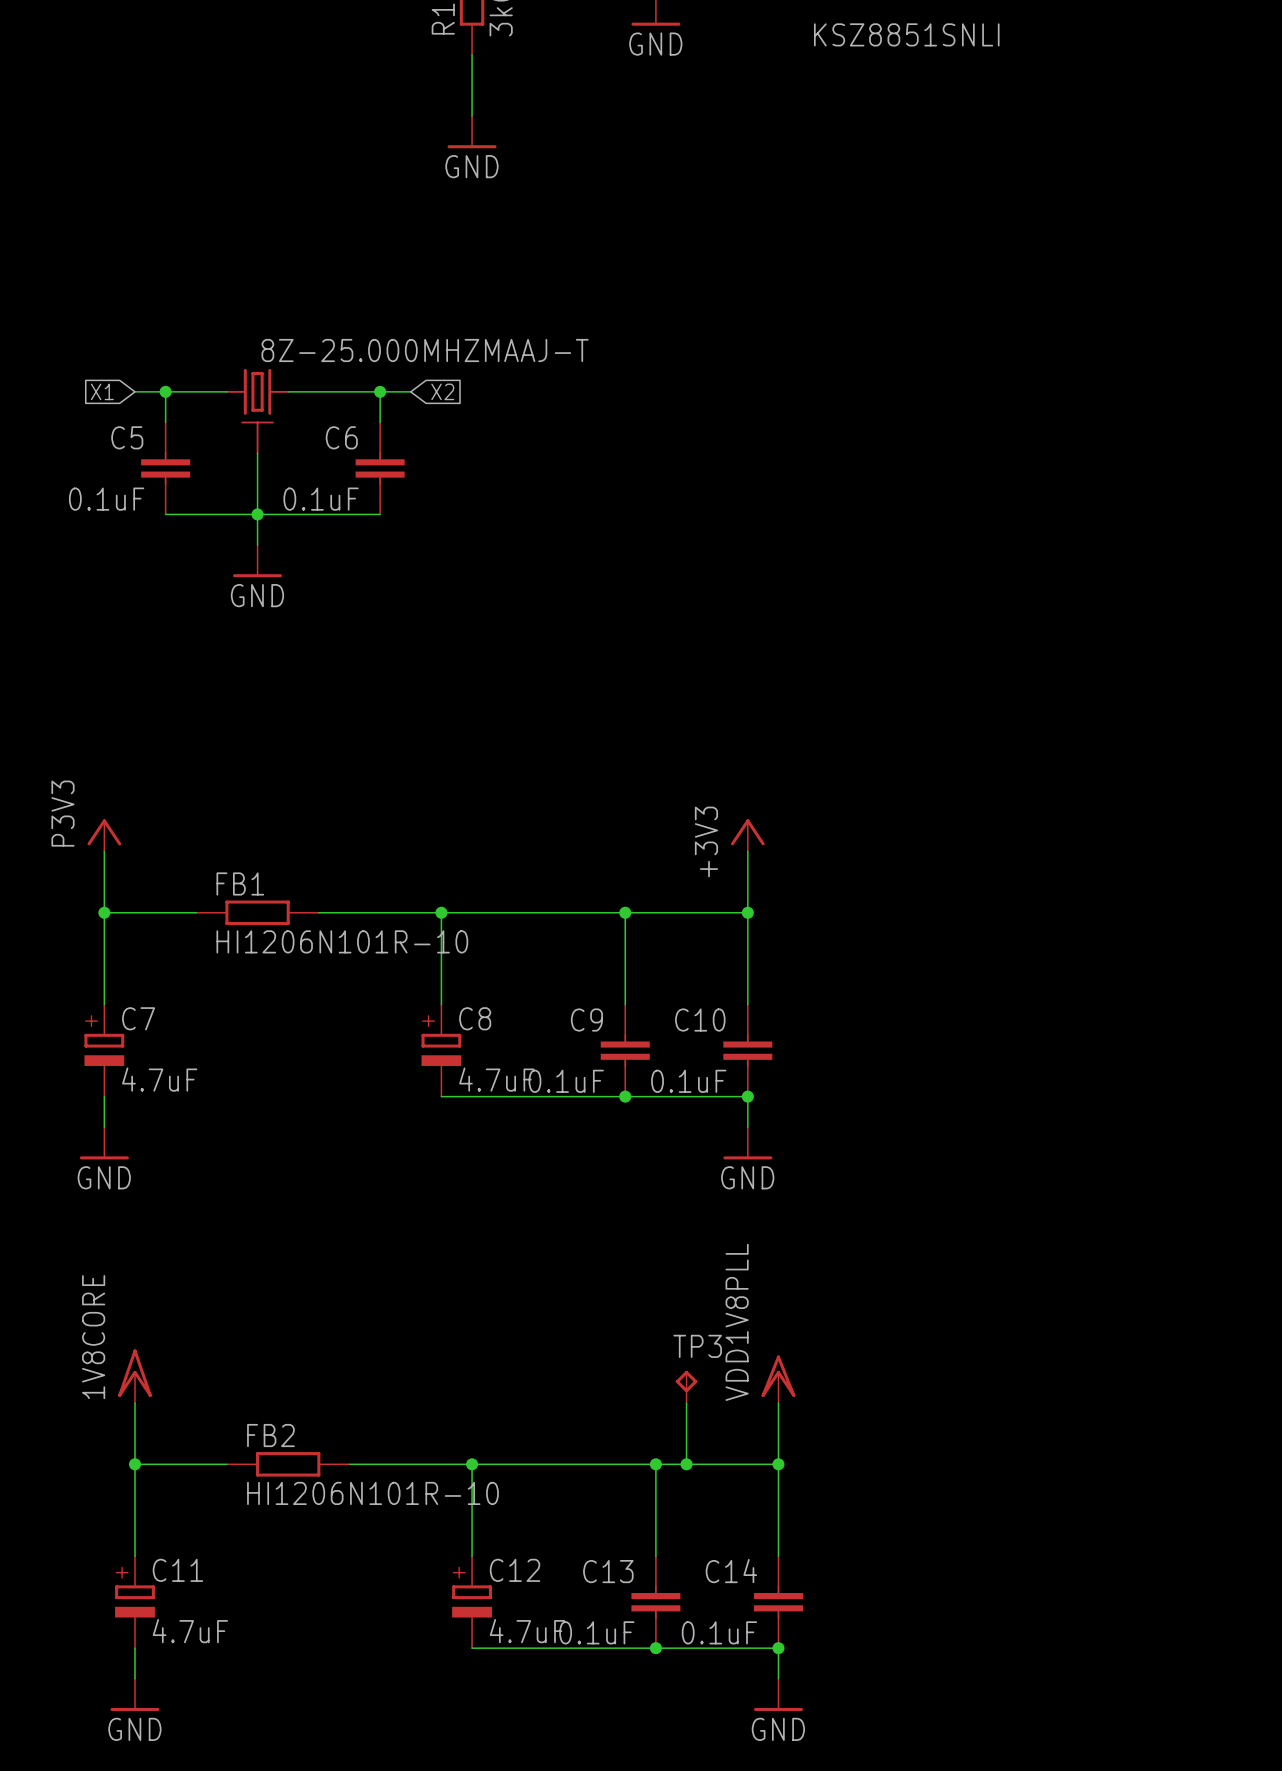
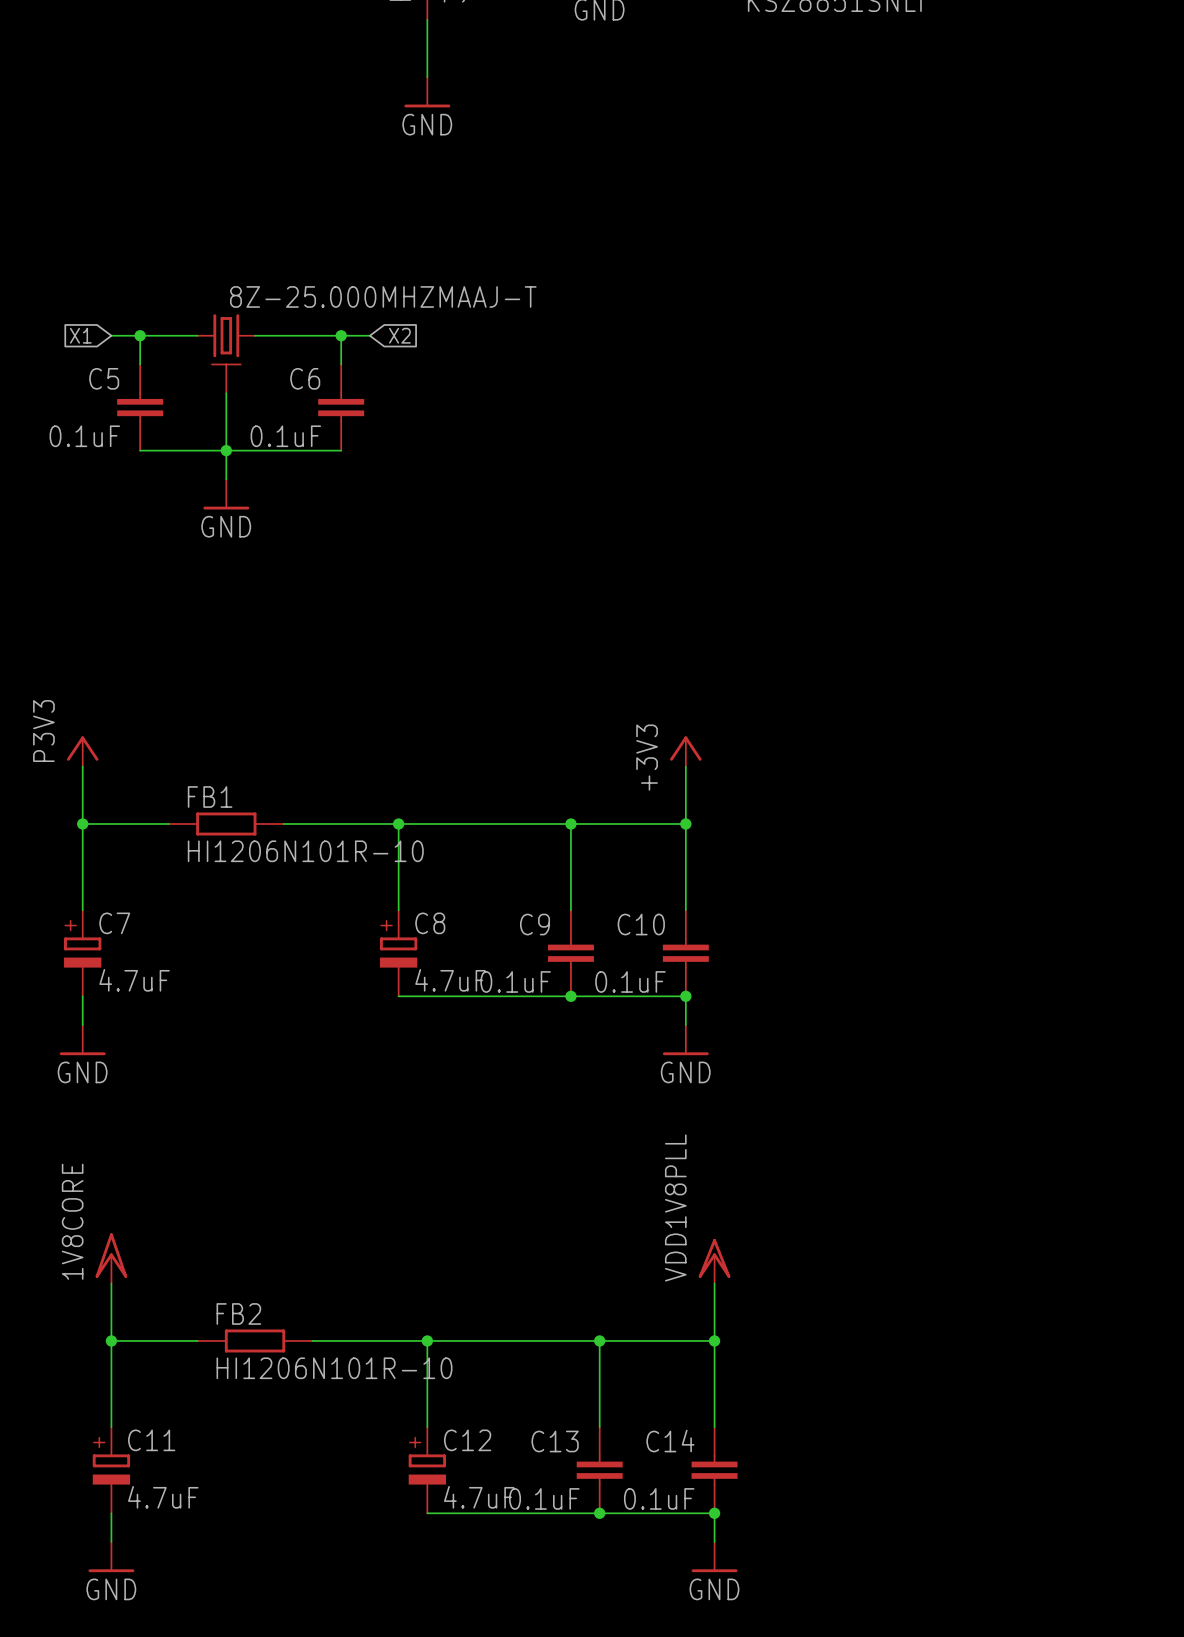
TP3: (686, 1386) -> none
wire: (686, 1403) (686, 1464) -> none
junction: (686, 1464) -> none

